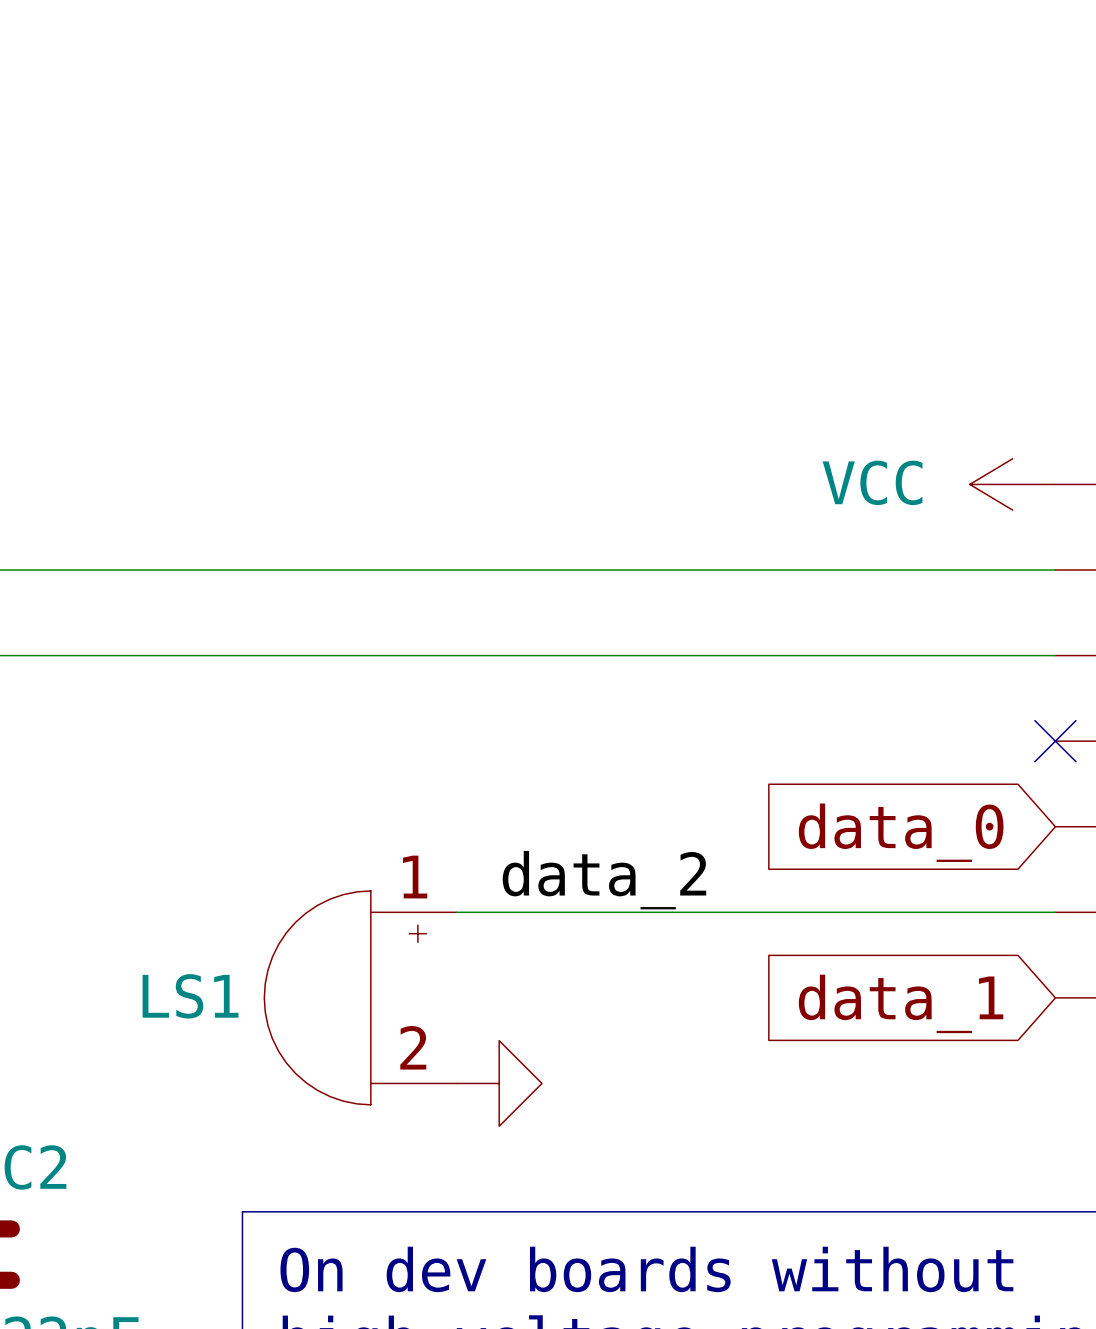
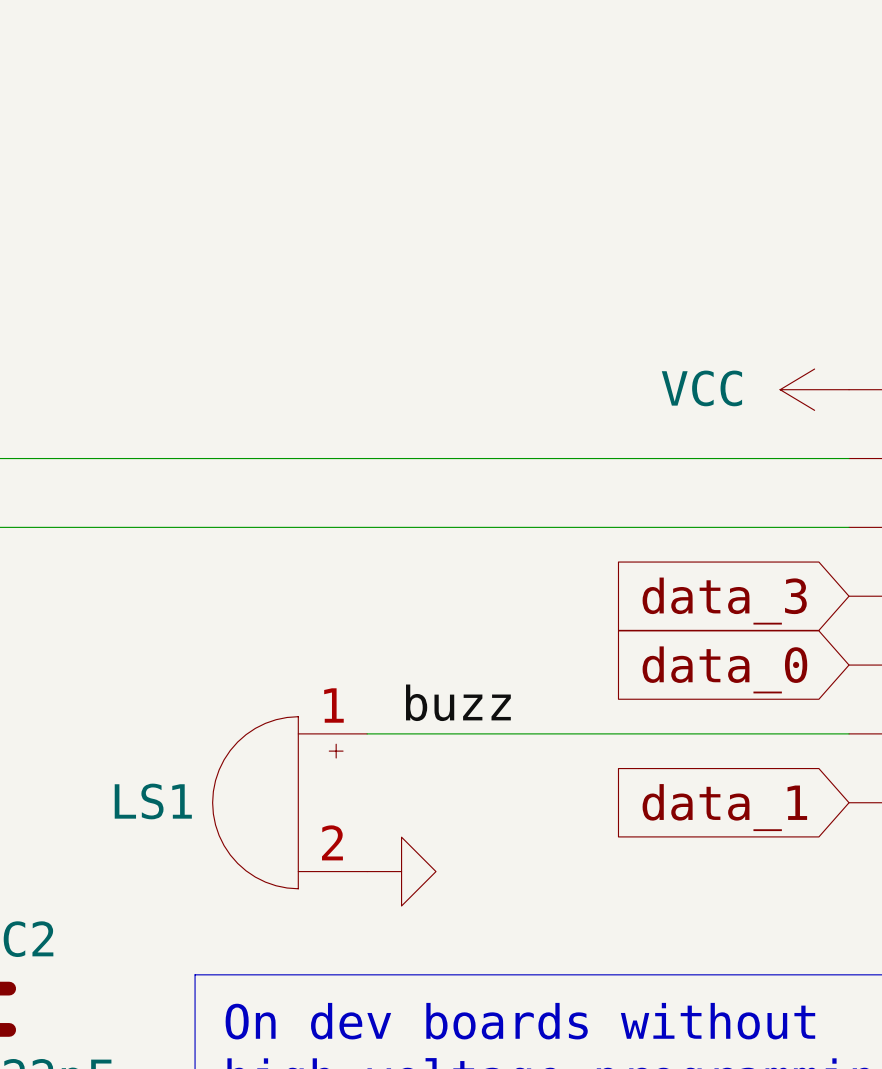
no-connect mark: (1055, 741) -> none
global label: none -> data_3 (724, 601)
label: data_2 (604, 880) -> buzz (458, 702)

